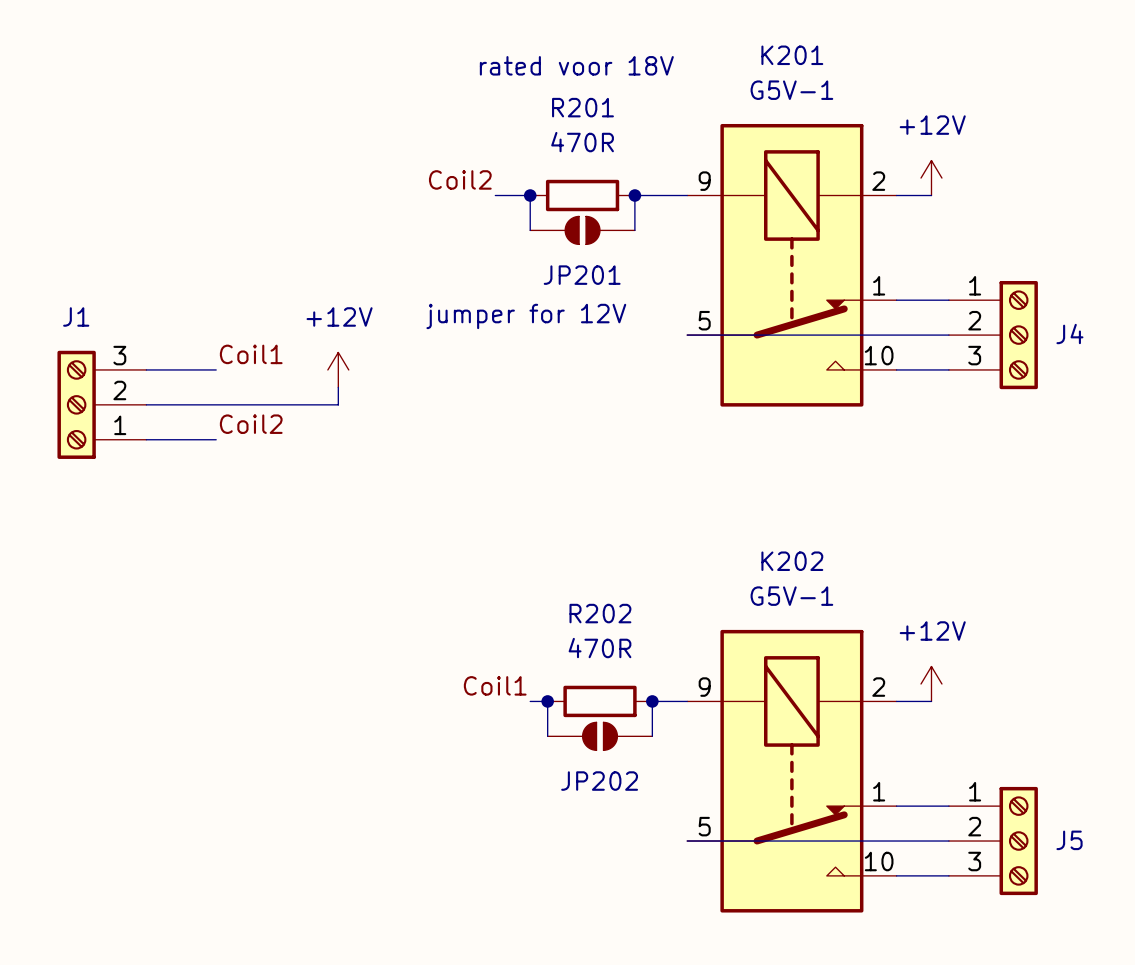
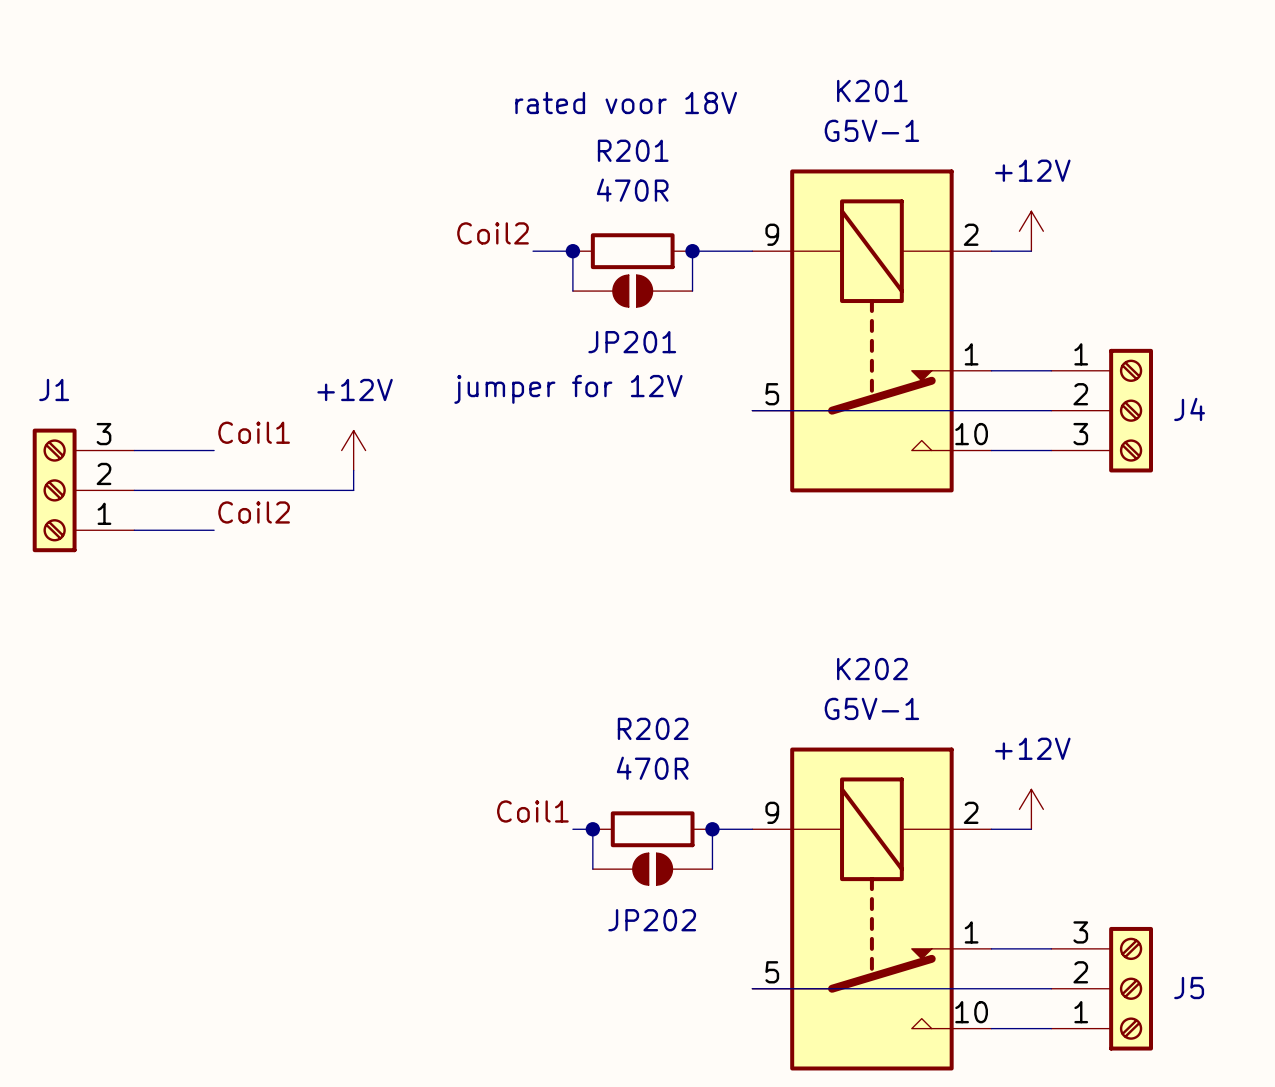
J5 flip: as is (1018, 841) -> up-down (1131, 988)

